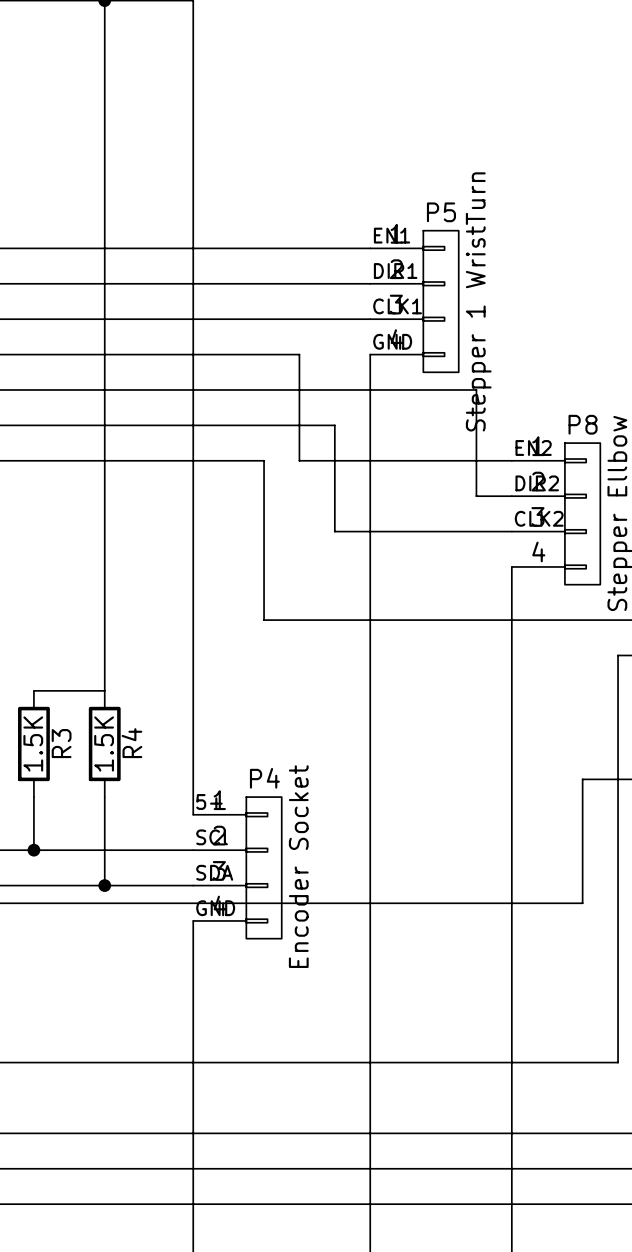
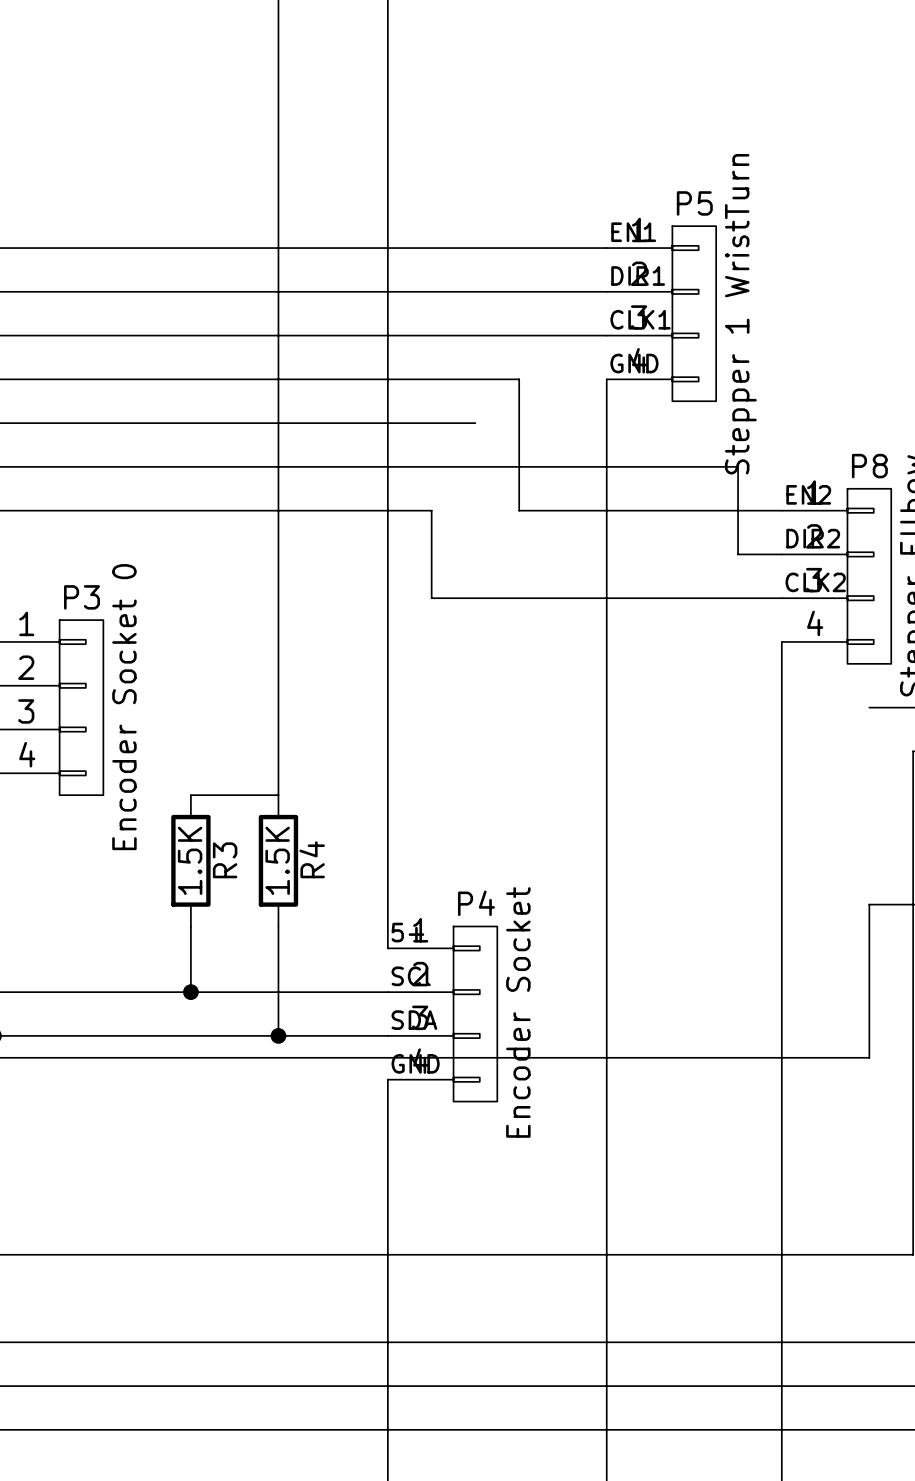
wire: (264, 389) (476, 389) (476, 425) -> (562, 466) (738, 466)
wire: (334, 425) (334, 531) -> (431, 510) (431, 598) (562, 598)
wire: (228, 460) (264, 460) (264, 620) (582, 620) -> none

